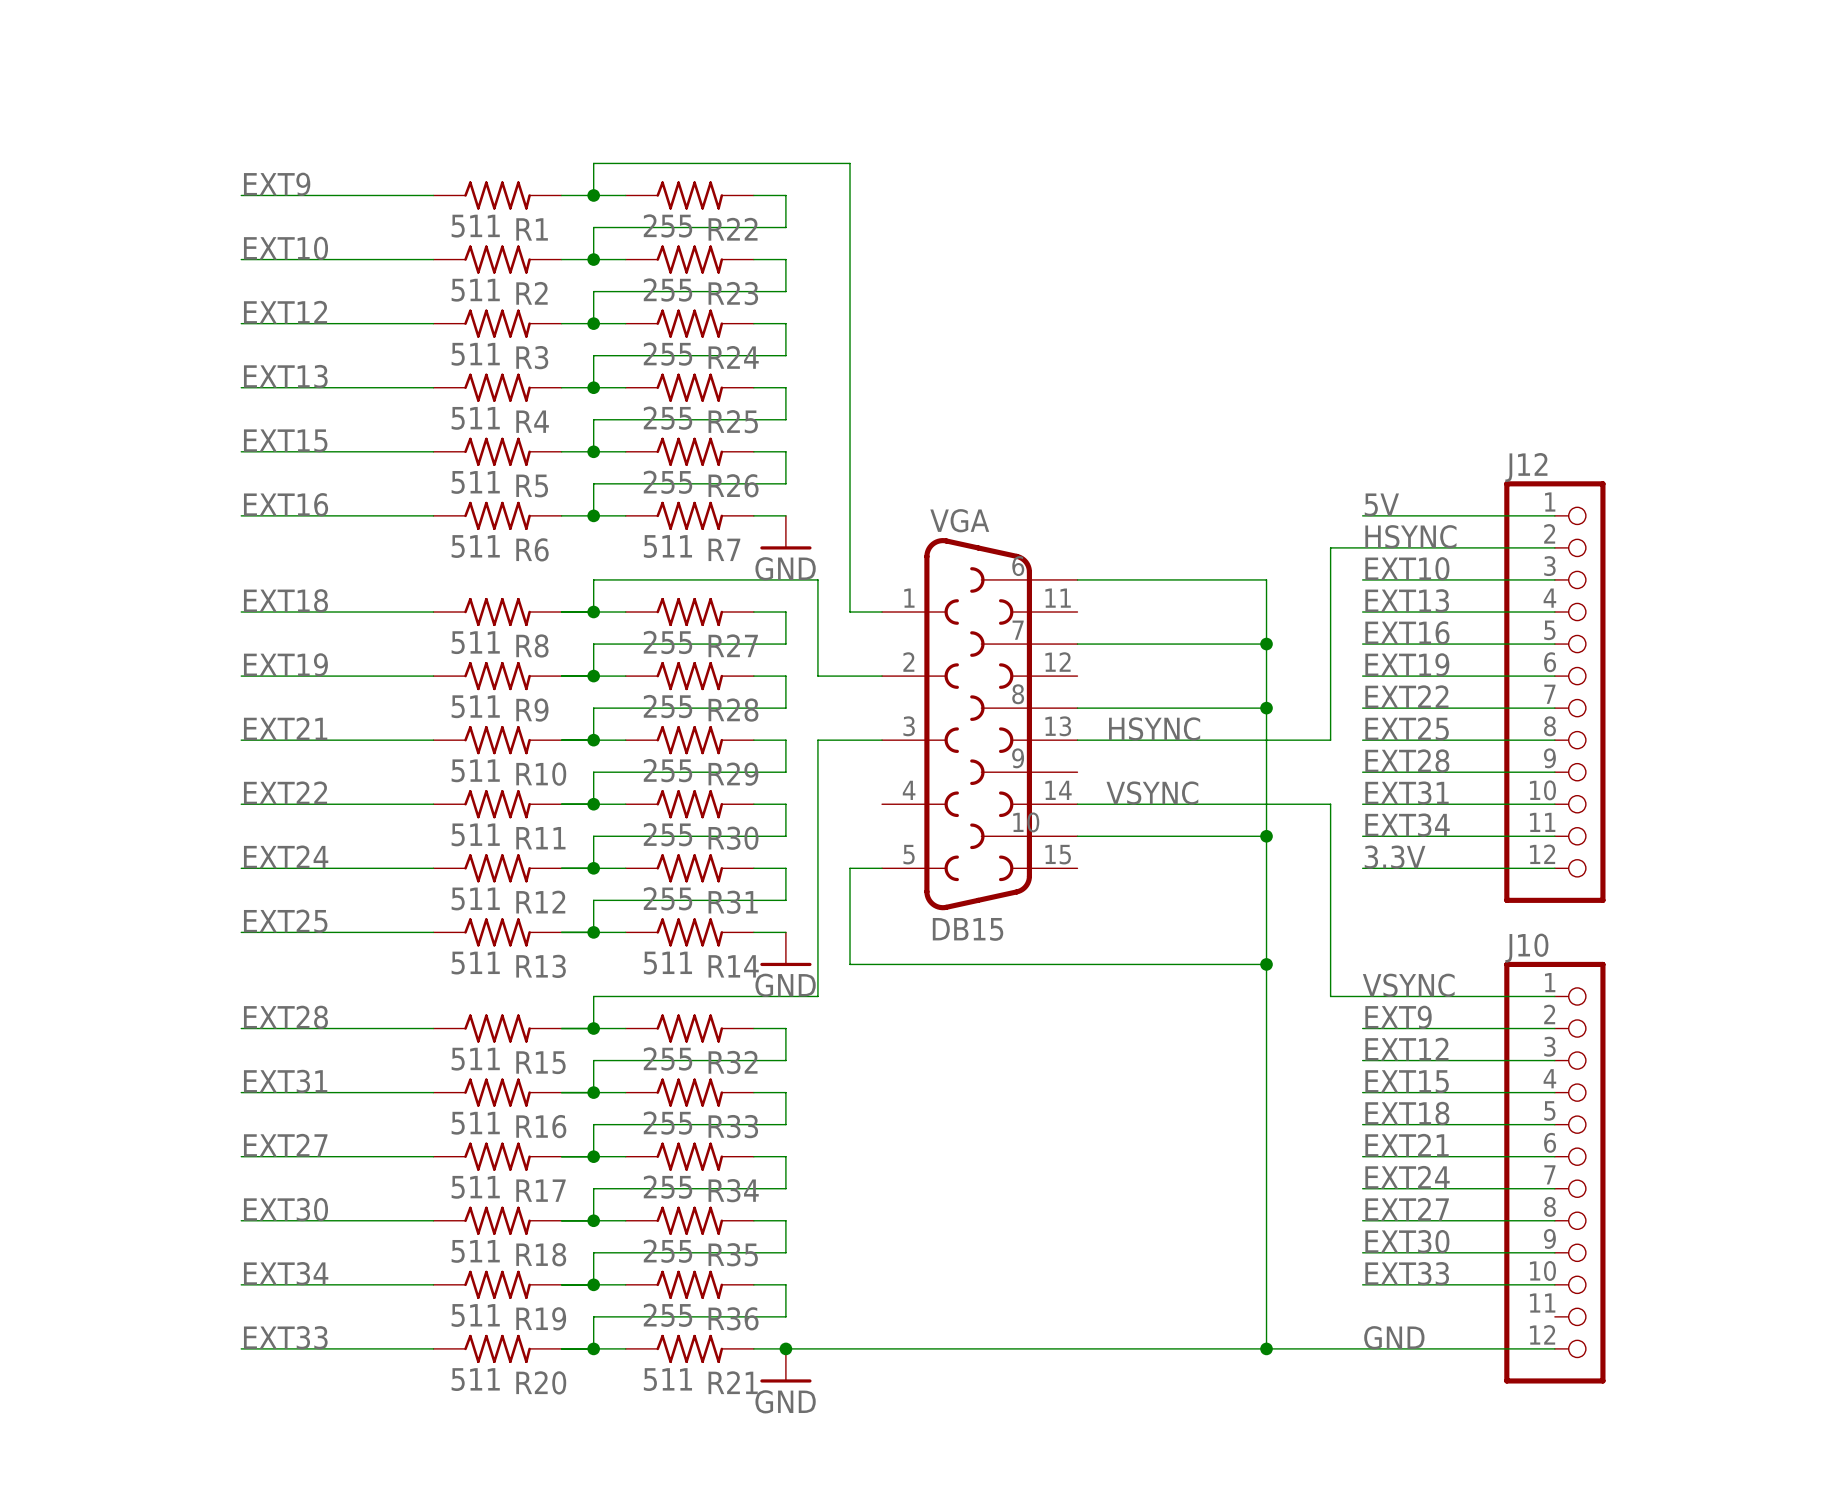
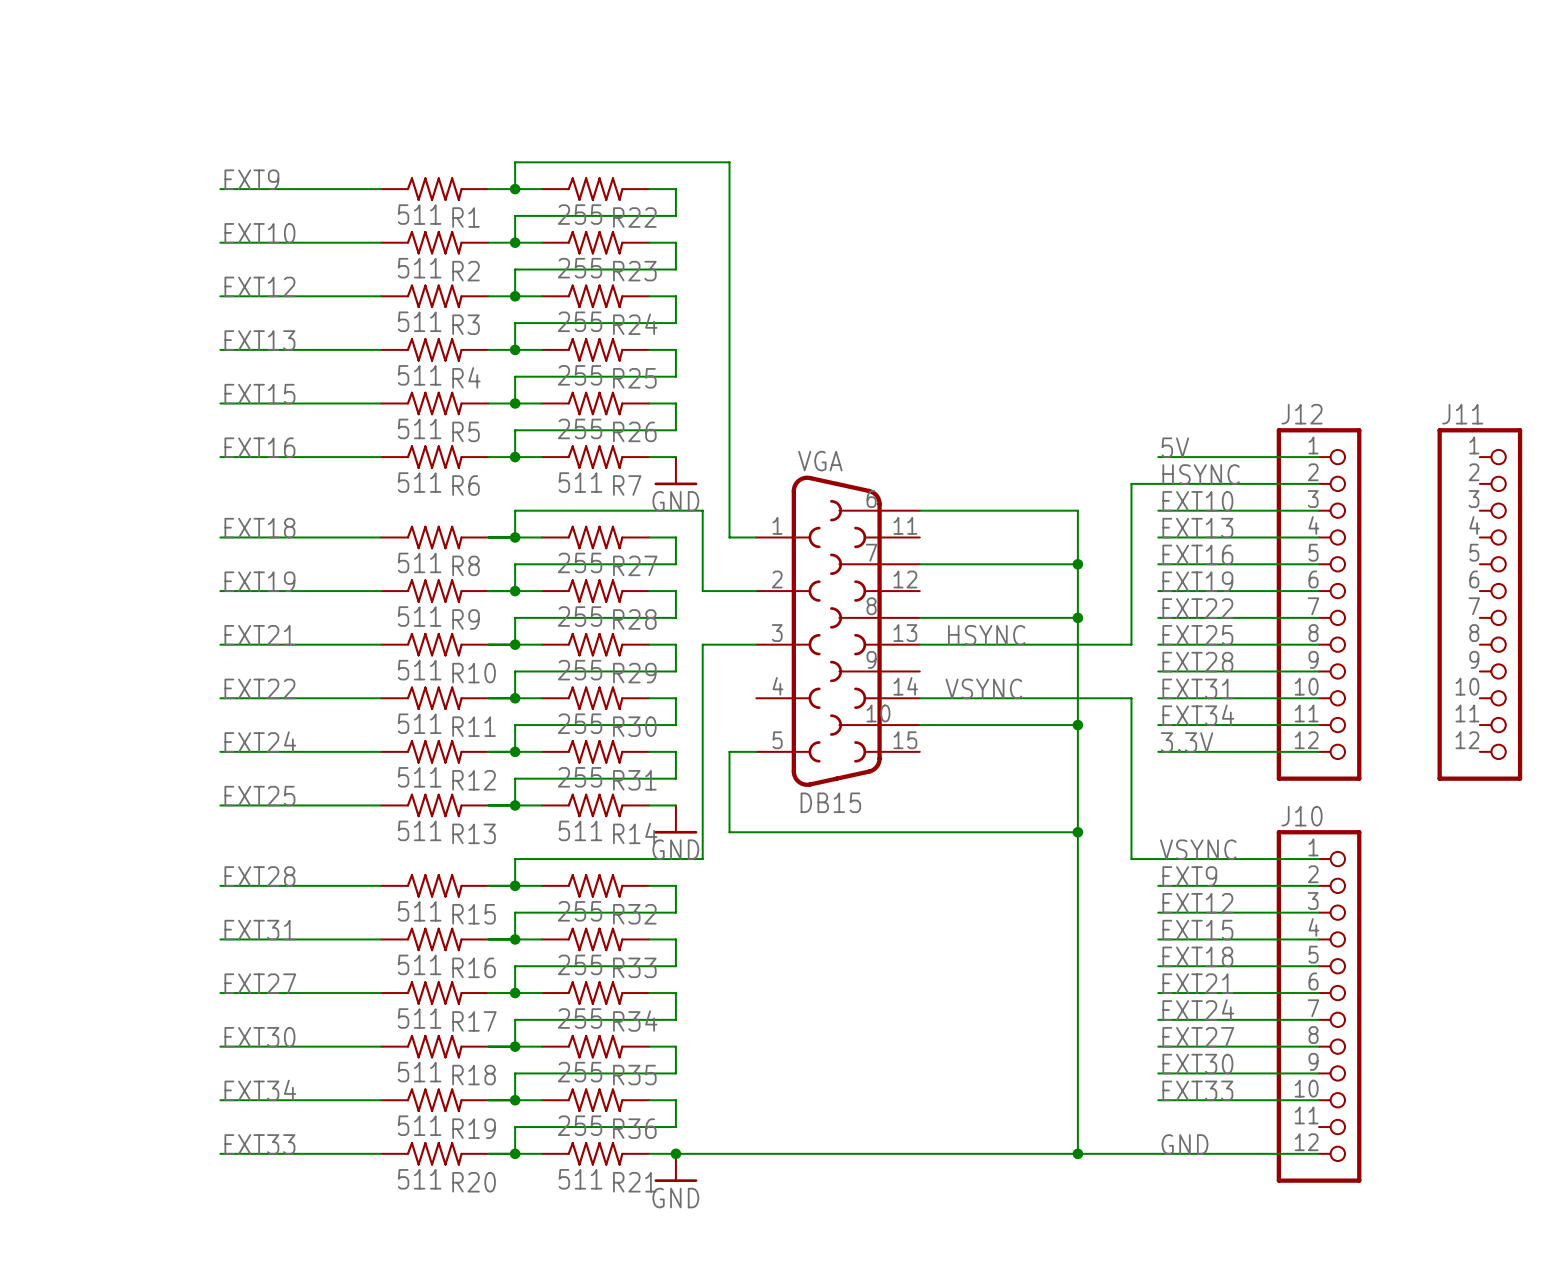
J11: none -> (1479, 604)

